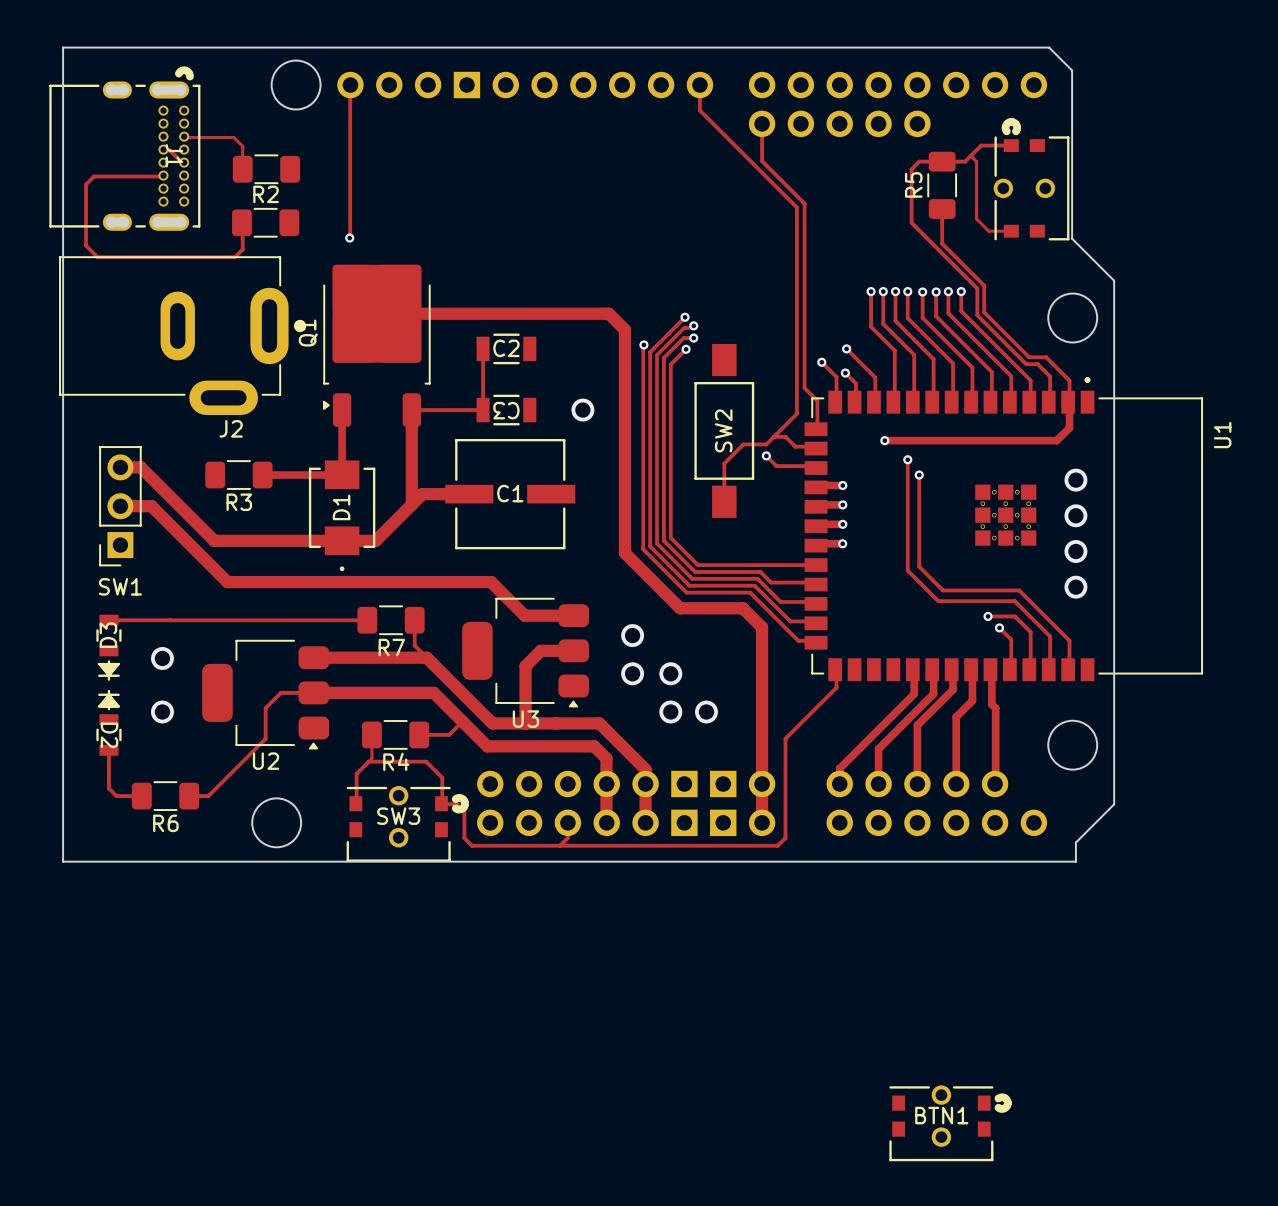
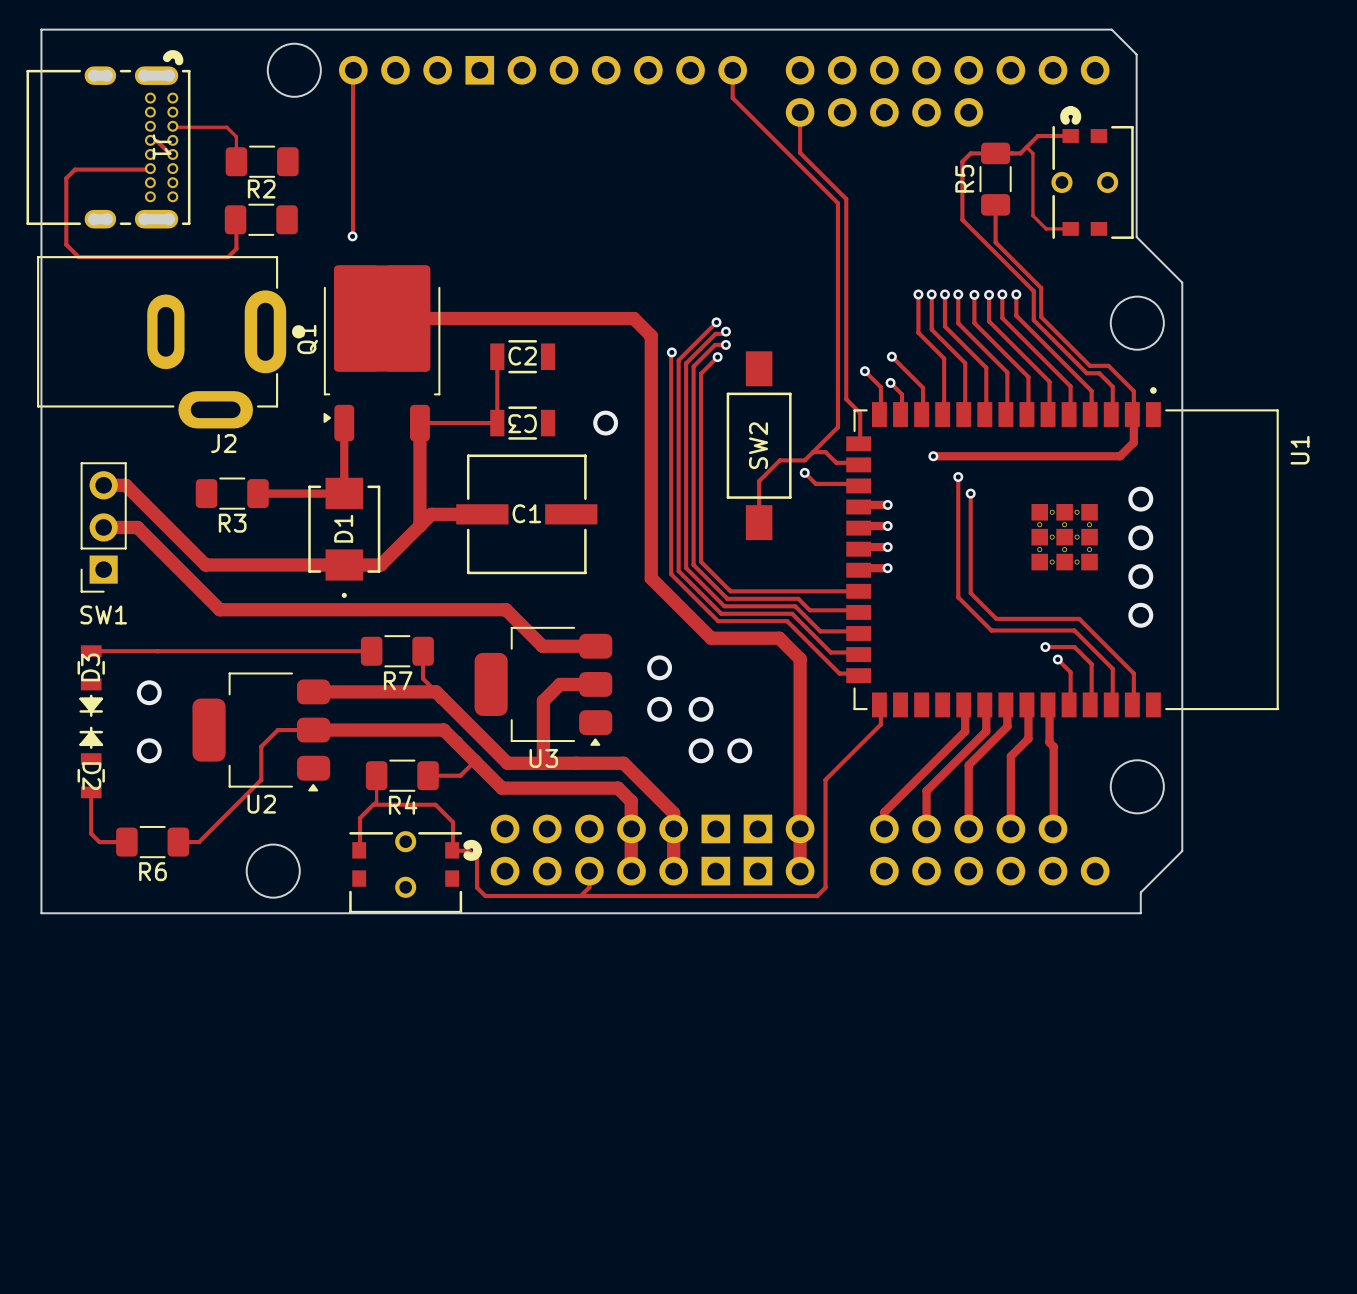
SW3 name: SW3 (398, 816) -> none
BTN1: (950, 1123) -> none

